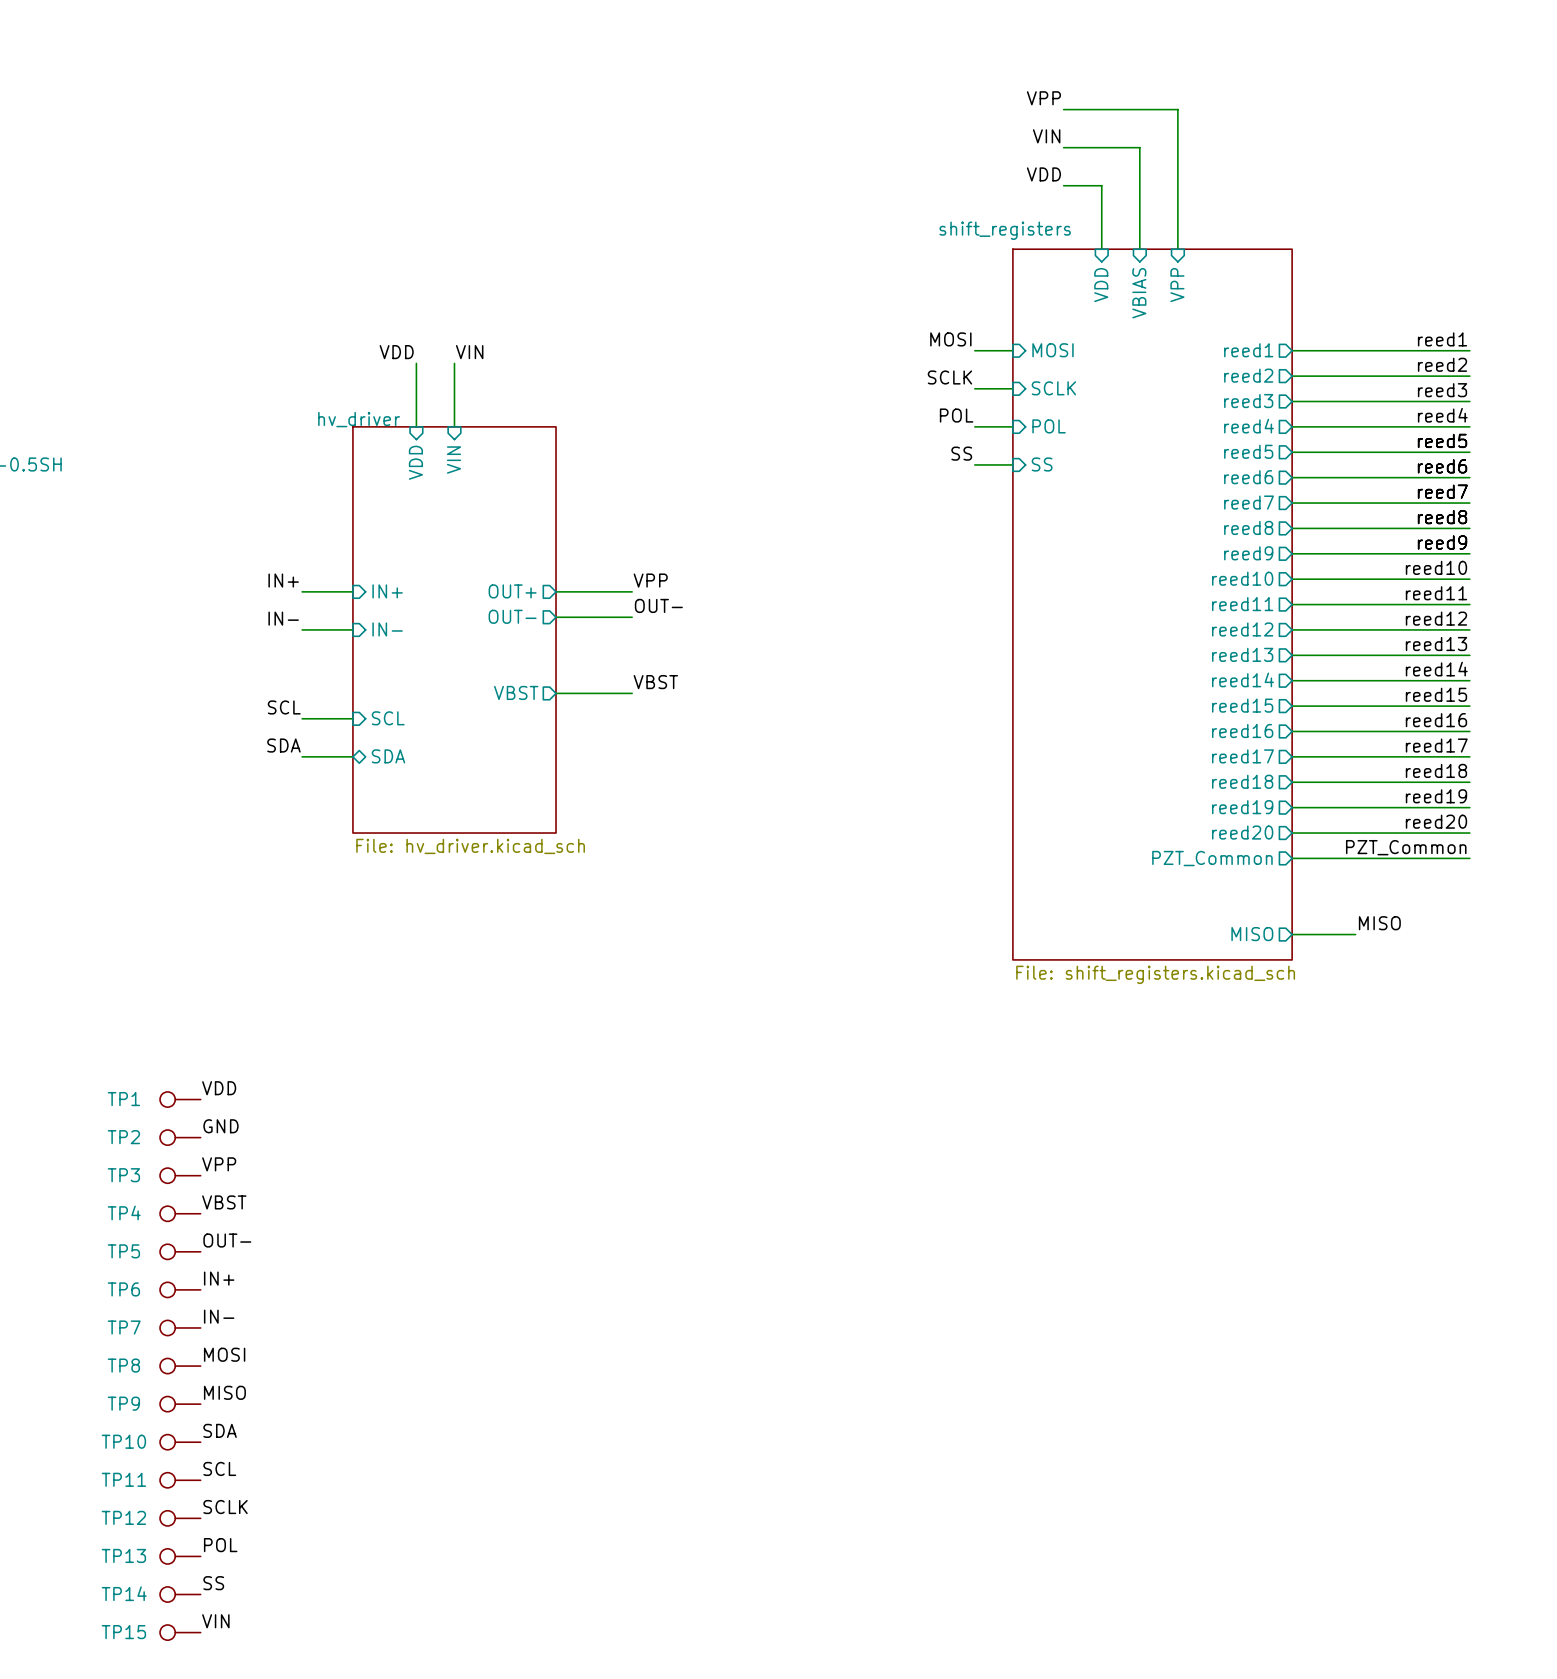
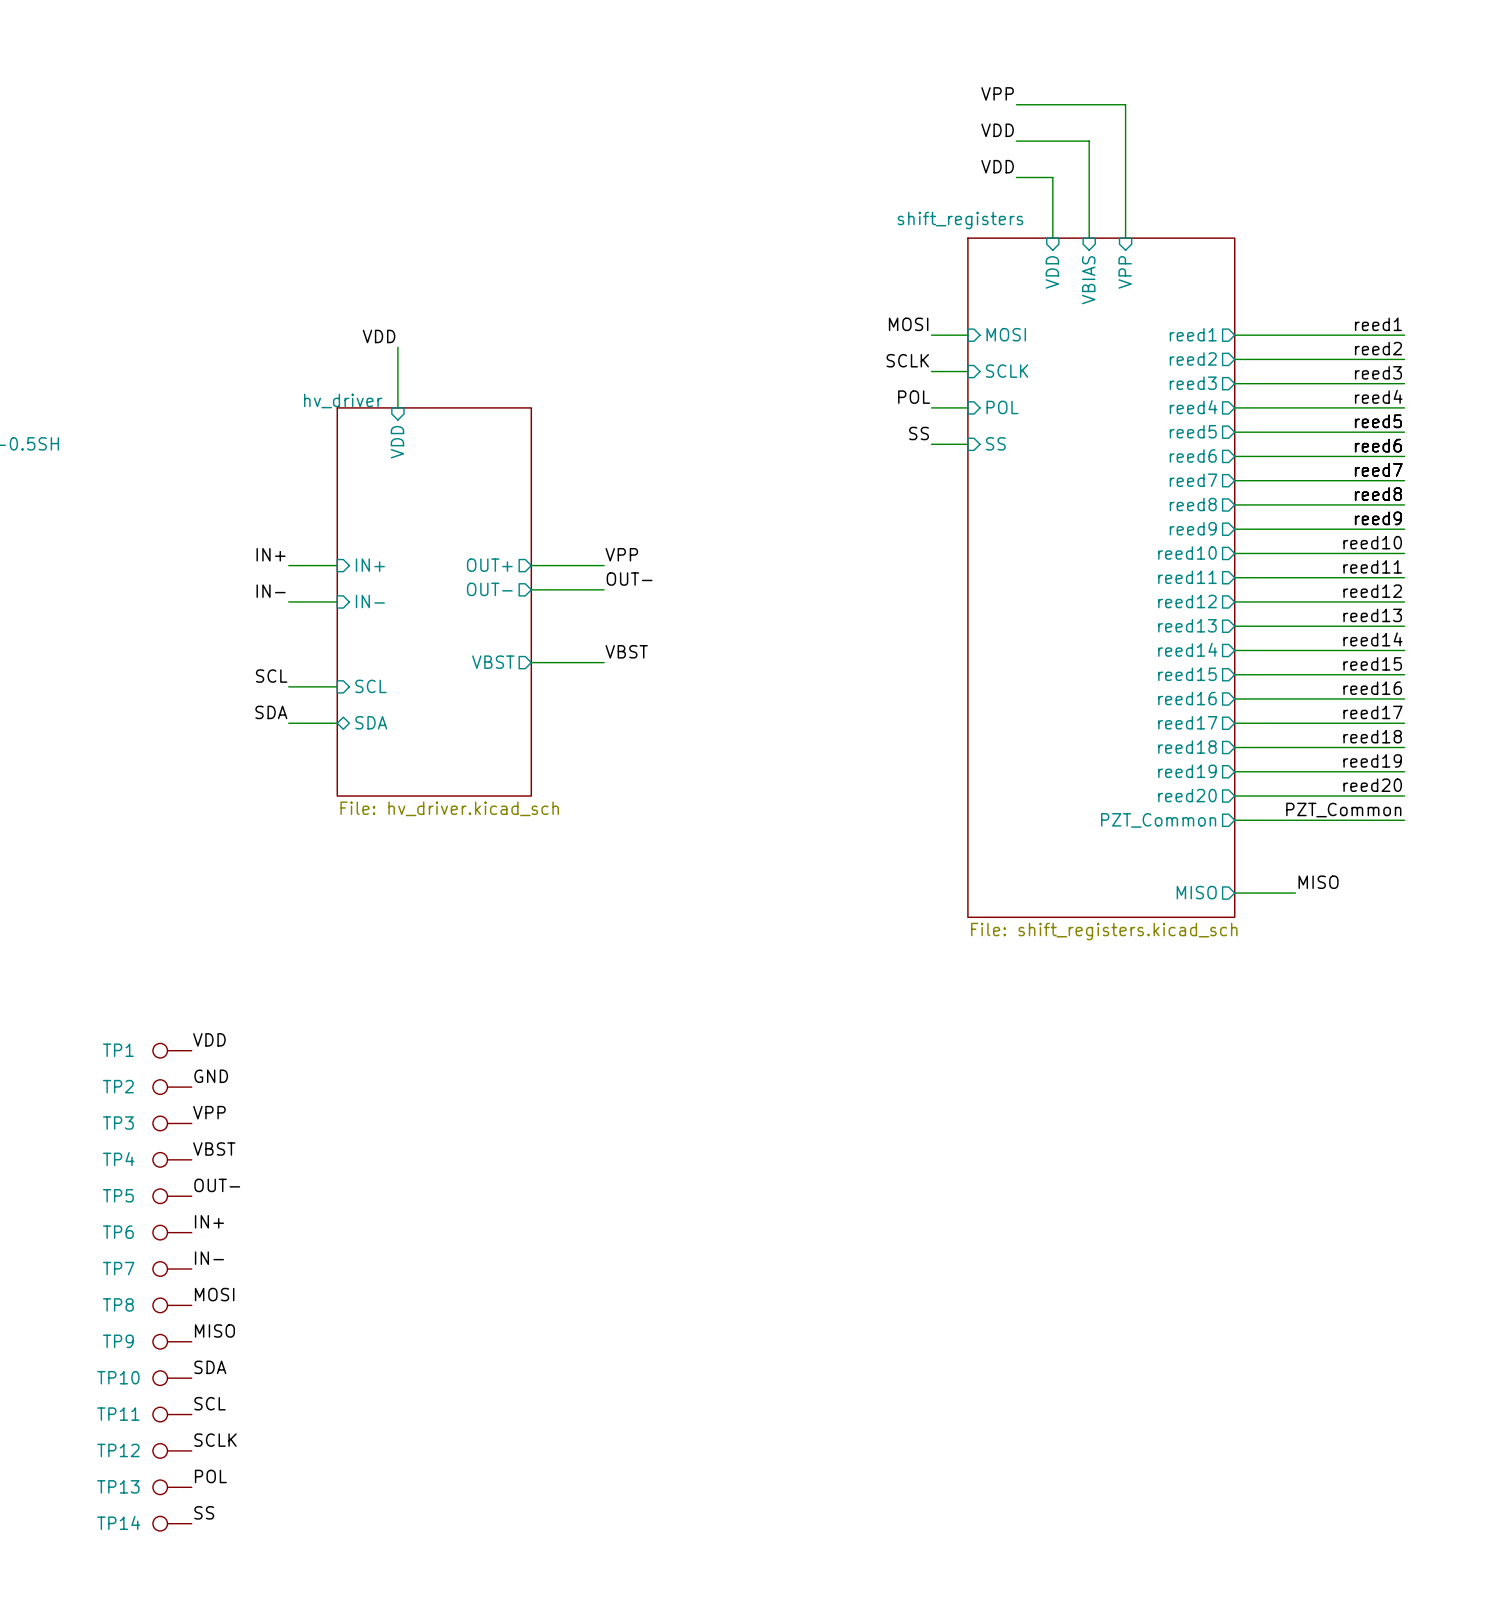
label: VIN (1046, 136) -> VDD (997, 130)
label: VIN (469, 352) -> none
wire: (454, 363) (454, 426) -> none
sheet pin: VIN (454, 460) -> none
label: VIN (215, 1621) -> none
TP15: (180, 1632) -> none

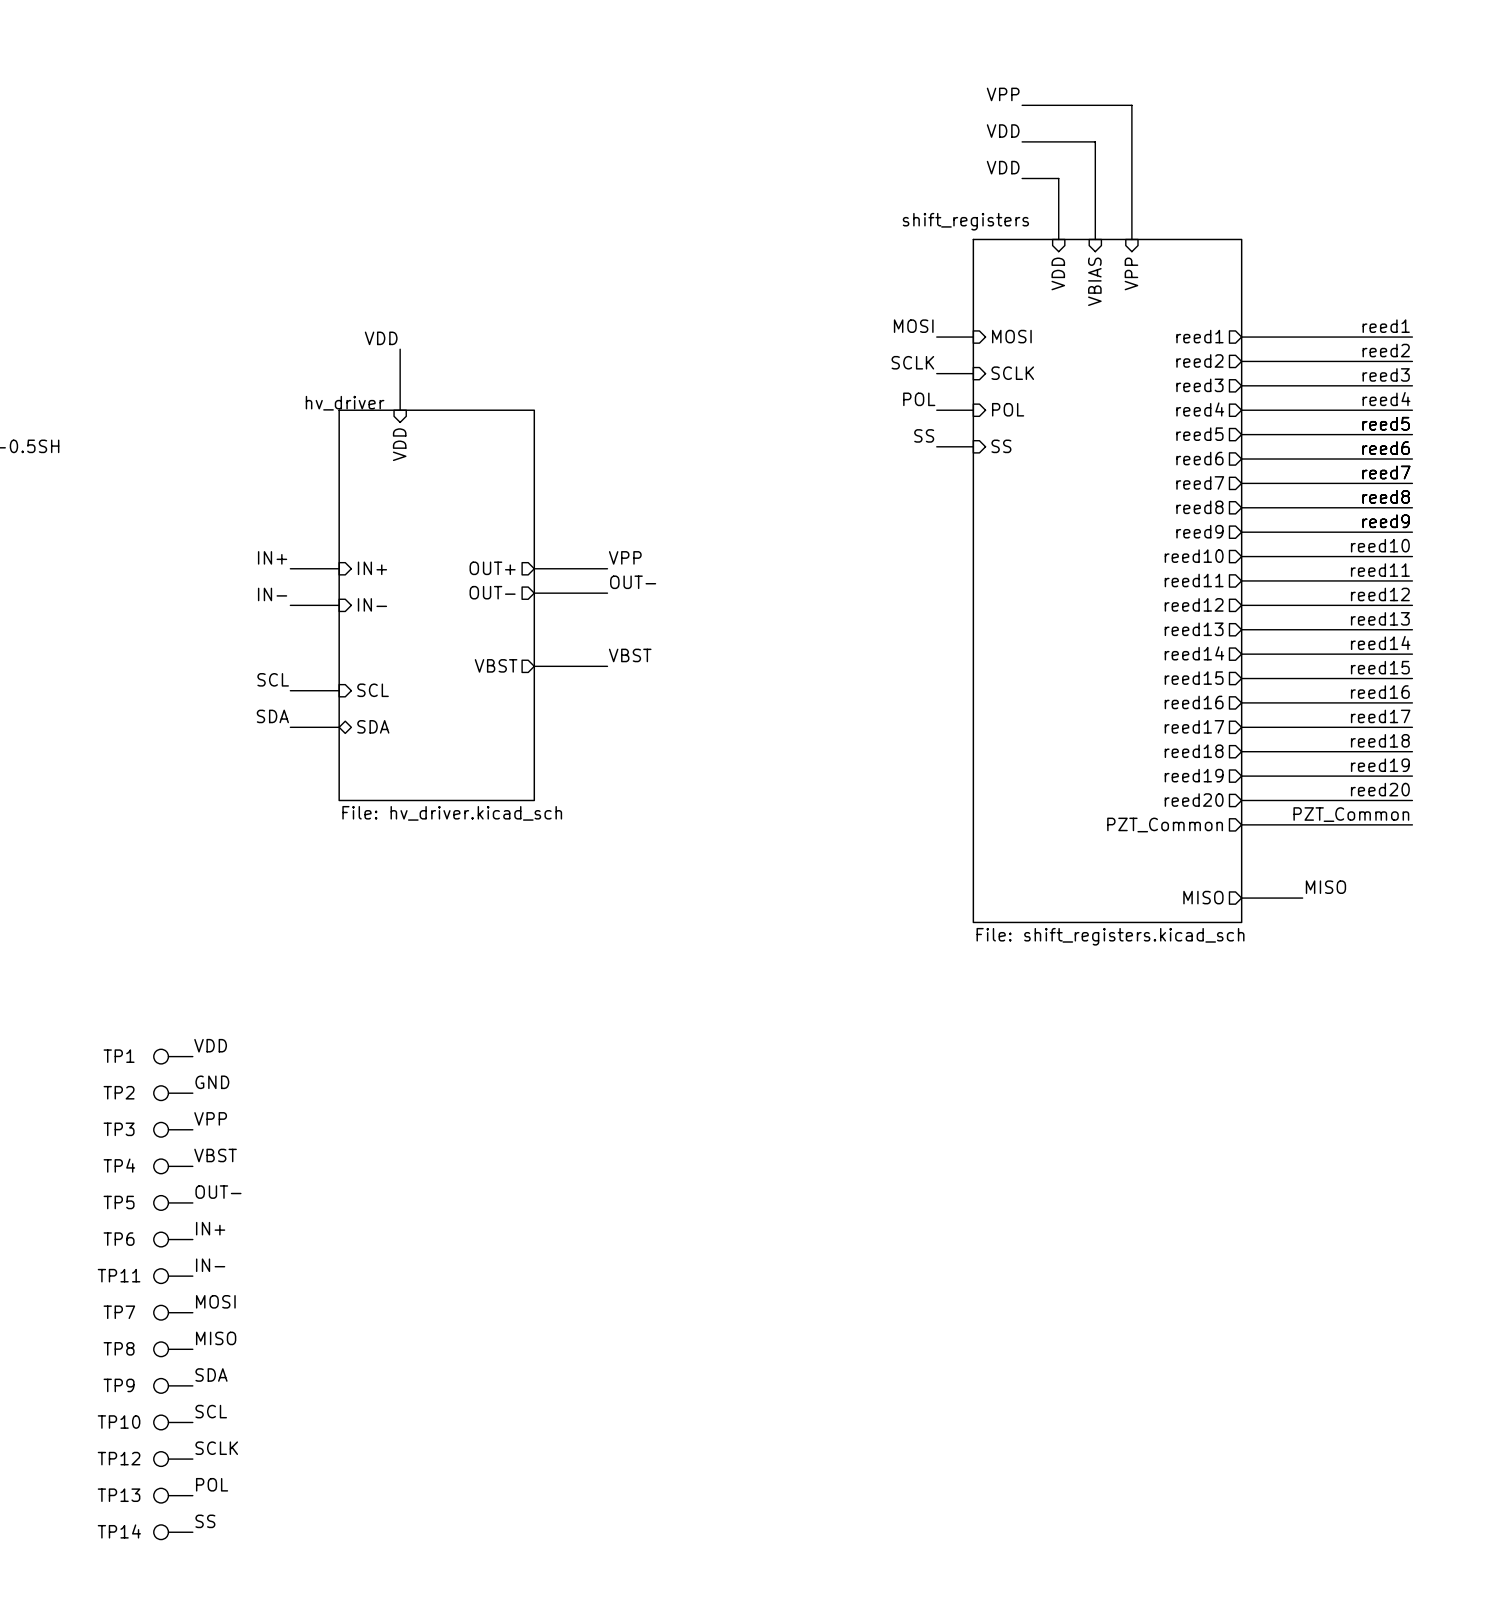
TP7 name: TP7 (118, 1268) -> TP11 (119, 1275)
TP8 name: TP8 (118, 1304) -> TP7 (119, 1312)
TP9 name: TP9 (118, 1341) -> TP8 (119, 1348)
TP10 name: TP10 (118, 1377) -> TP9 (119, 1385)
TP11 name: TP11 (118, 1414) -> TP10 (119, 1422)

